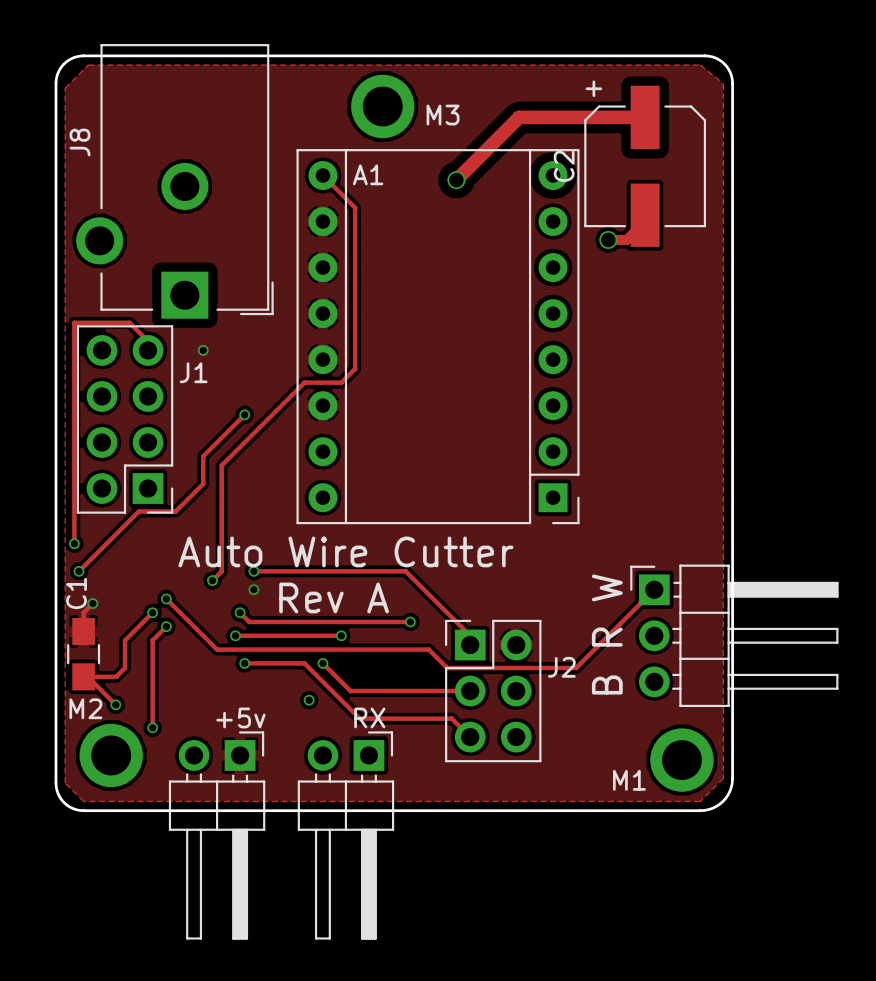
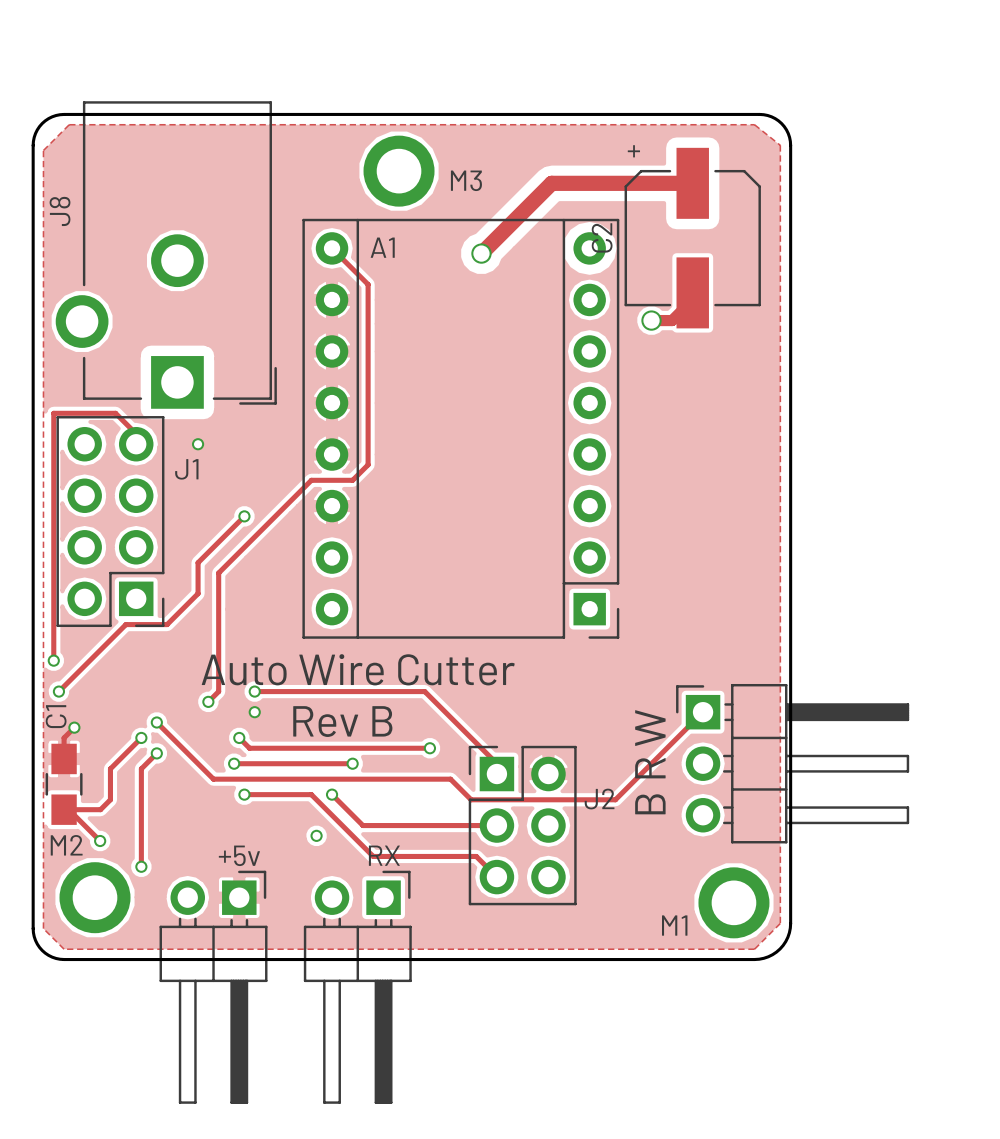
text: Rev A (334, 597) -> Rev B (342, 721)

